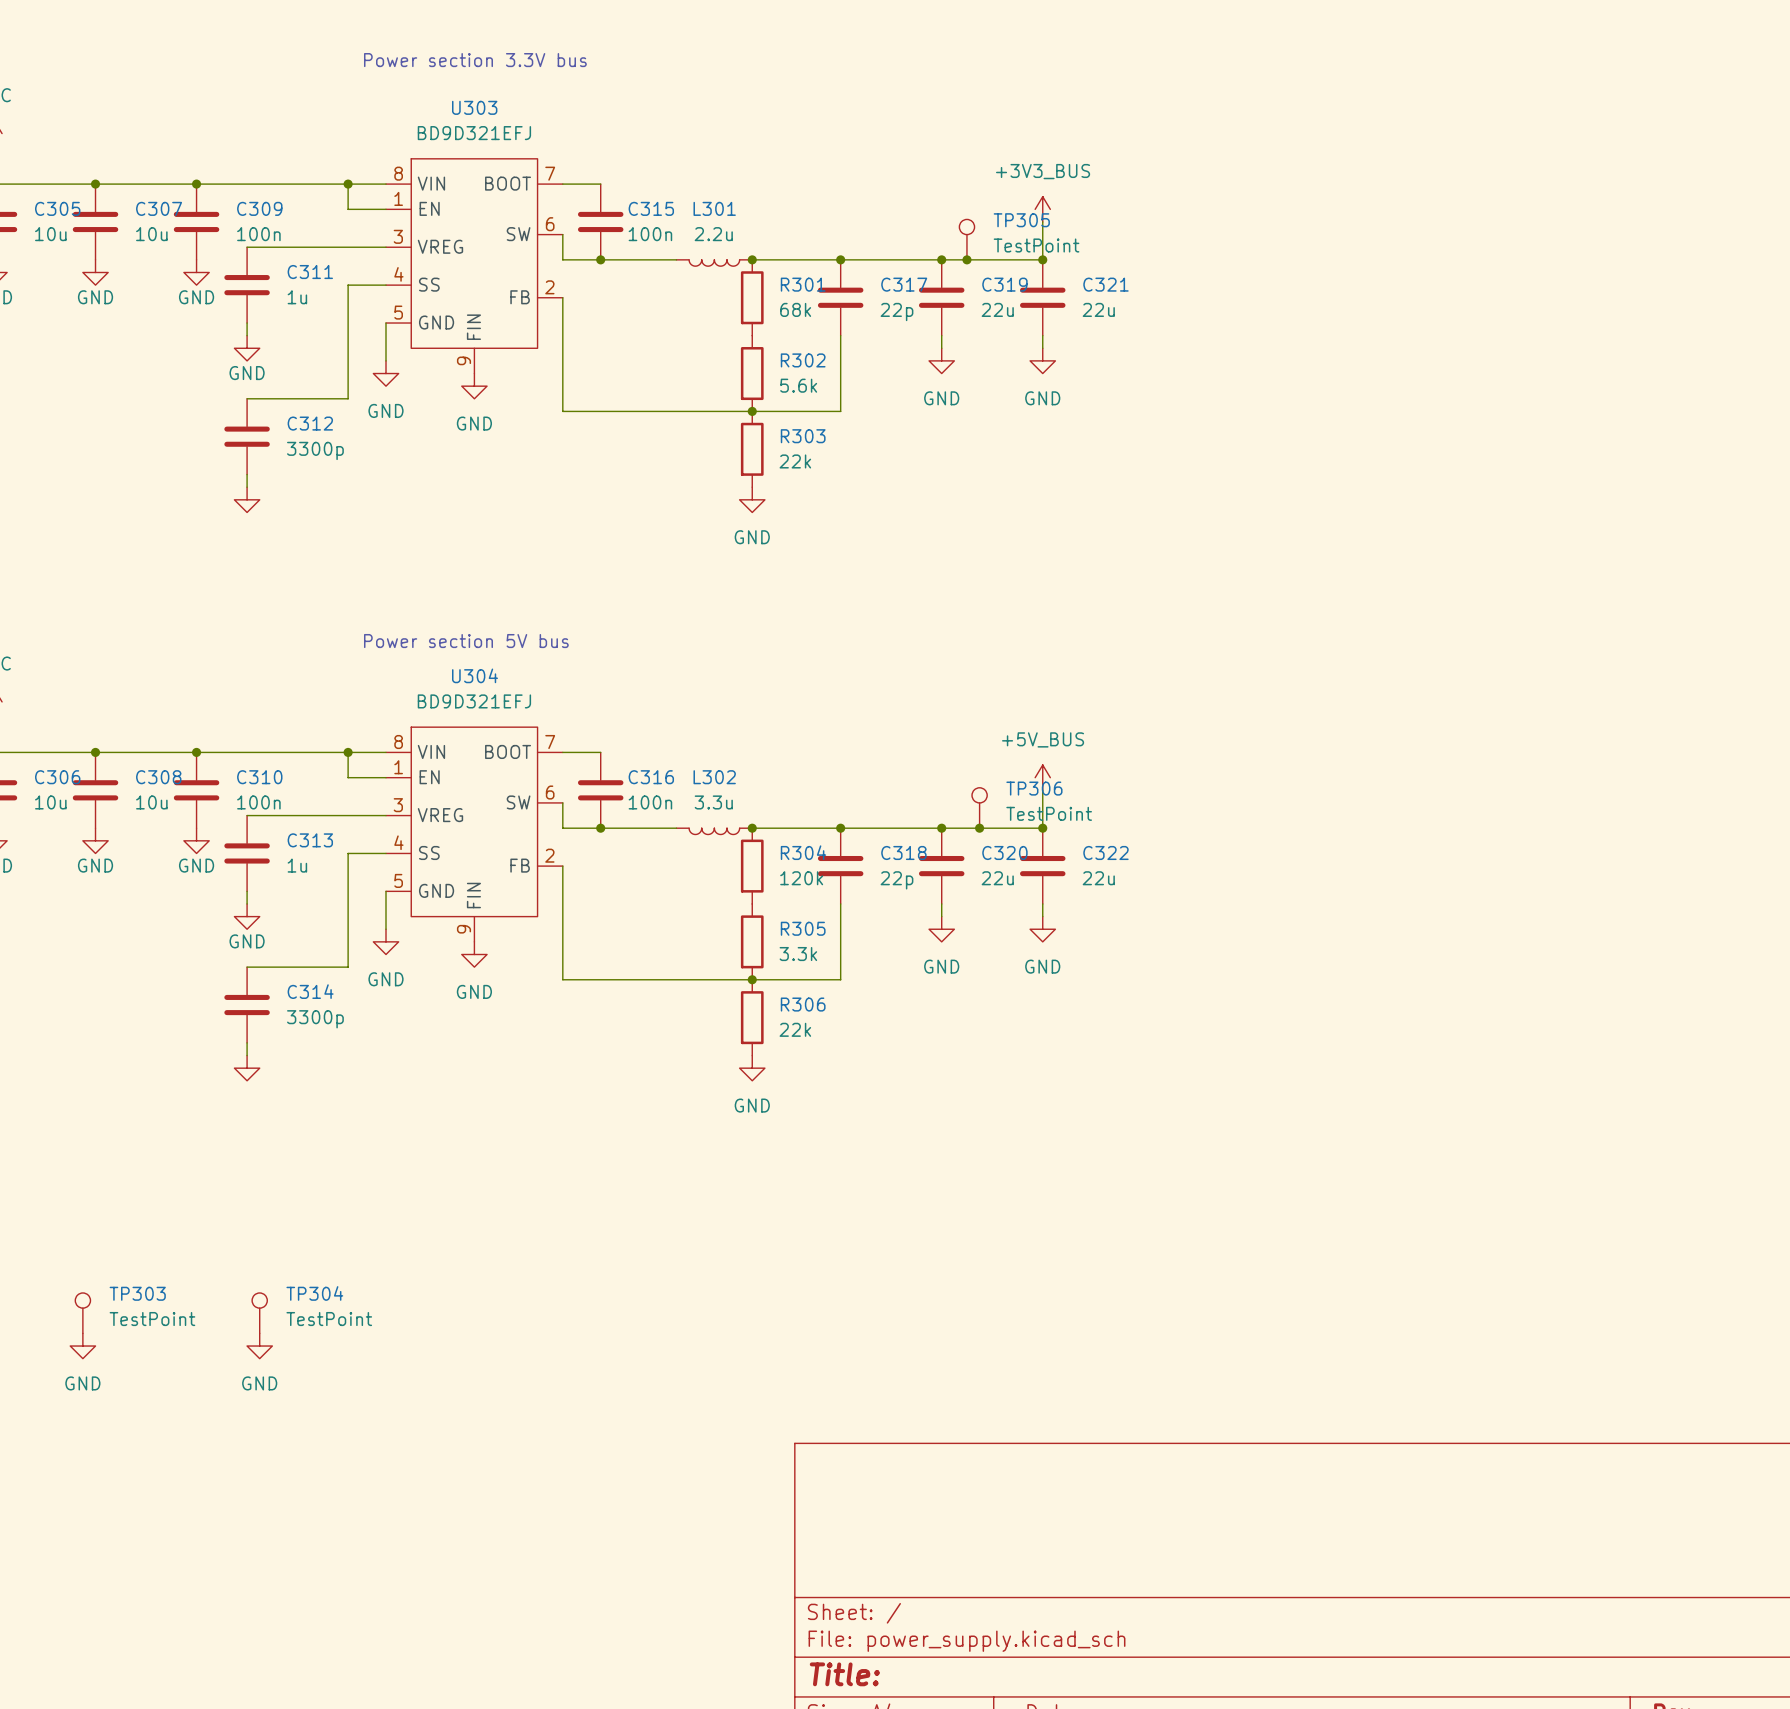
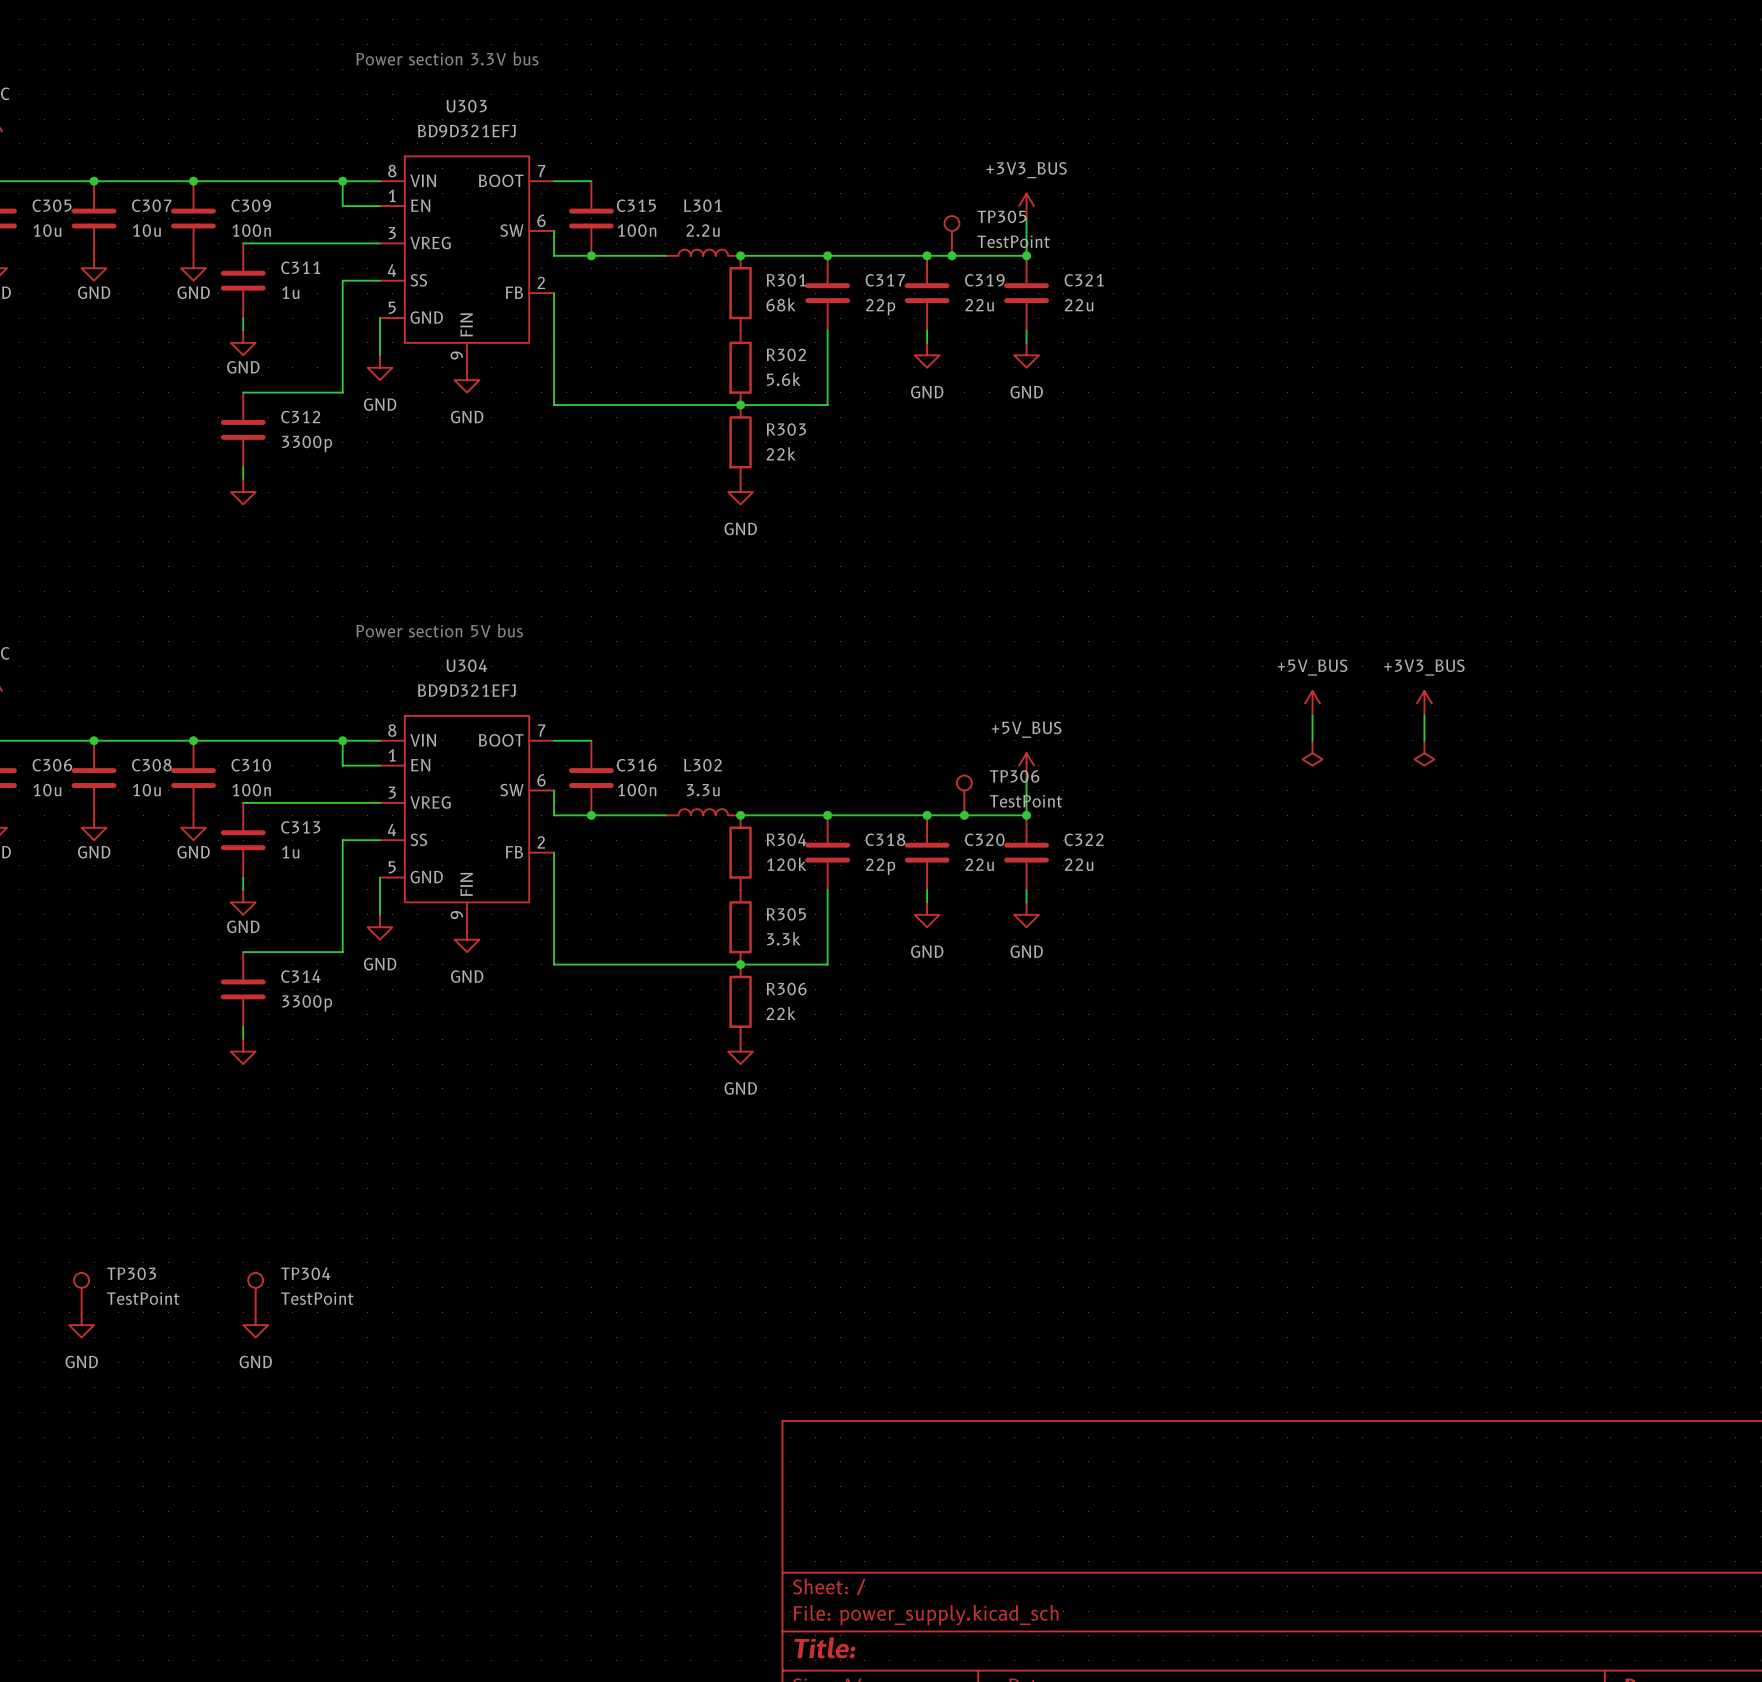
L301 rotation: 0° (714, 263) -> 180° (703, 252)
power symbol: none -> +5V_BUS (1312, 703)
power symbol: none -> +3V3_BUS (1424, 703)
wire: none -> (1312, 715) (1312, 740)
wire: none -> (1424, 715) (1424, 740)
power symbol: none -> (1312, 753)
power symbol: none -> (1424, 753)
L302 rotation: 0° (714, 831) -> 180° (703, 812)

